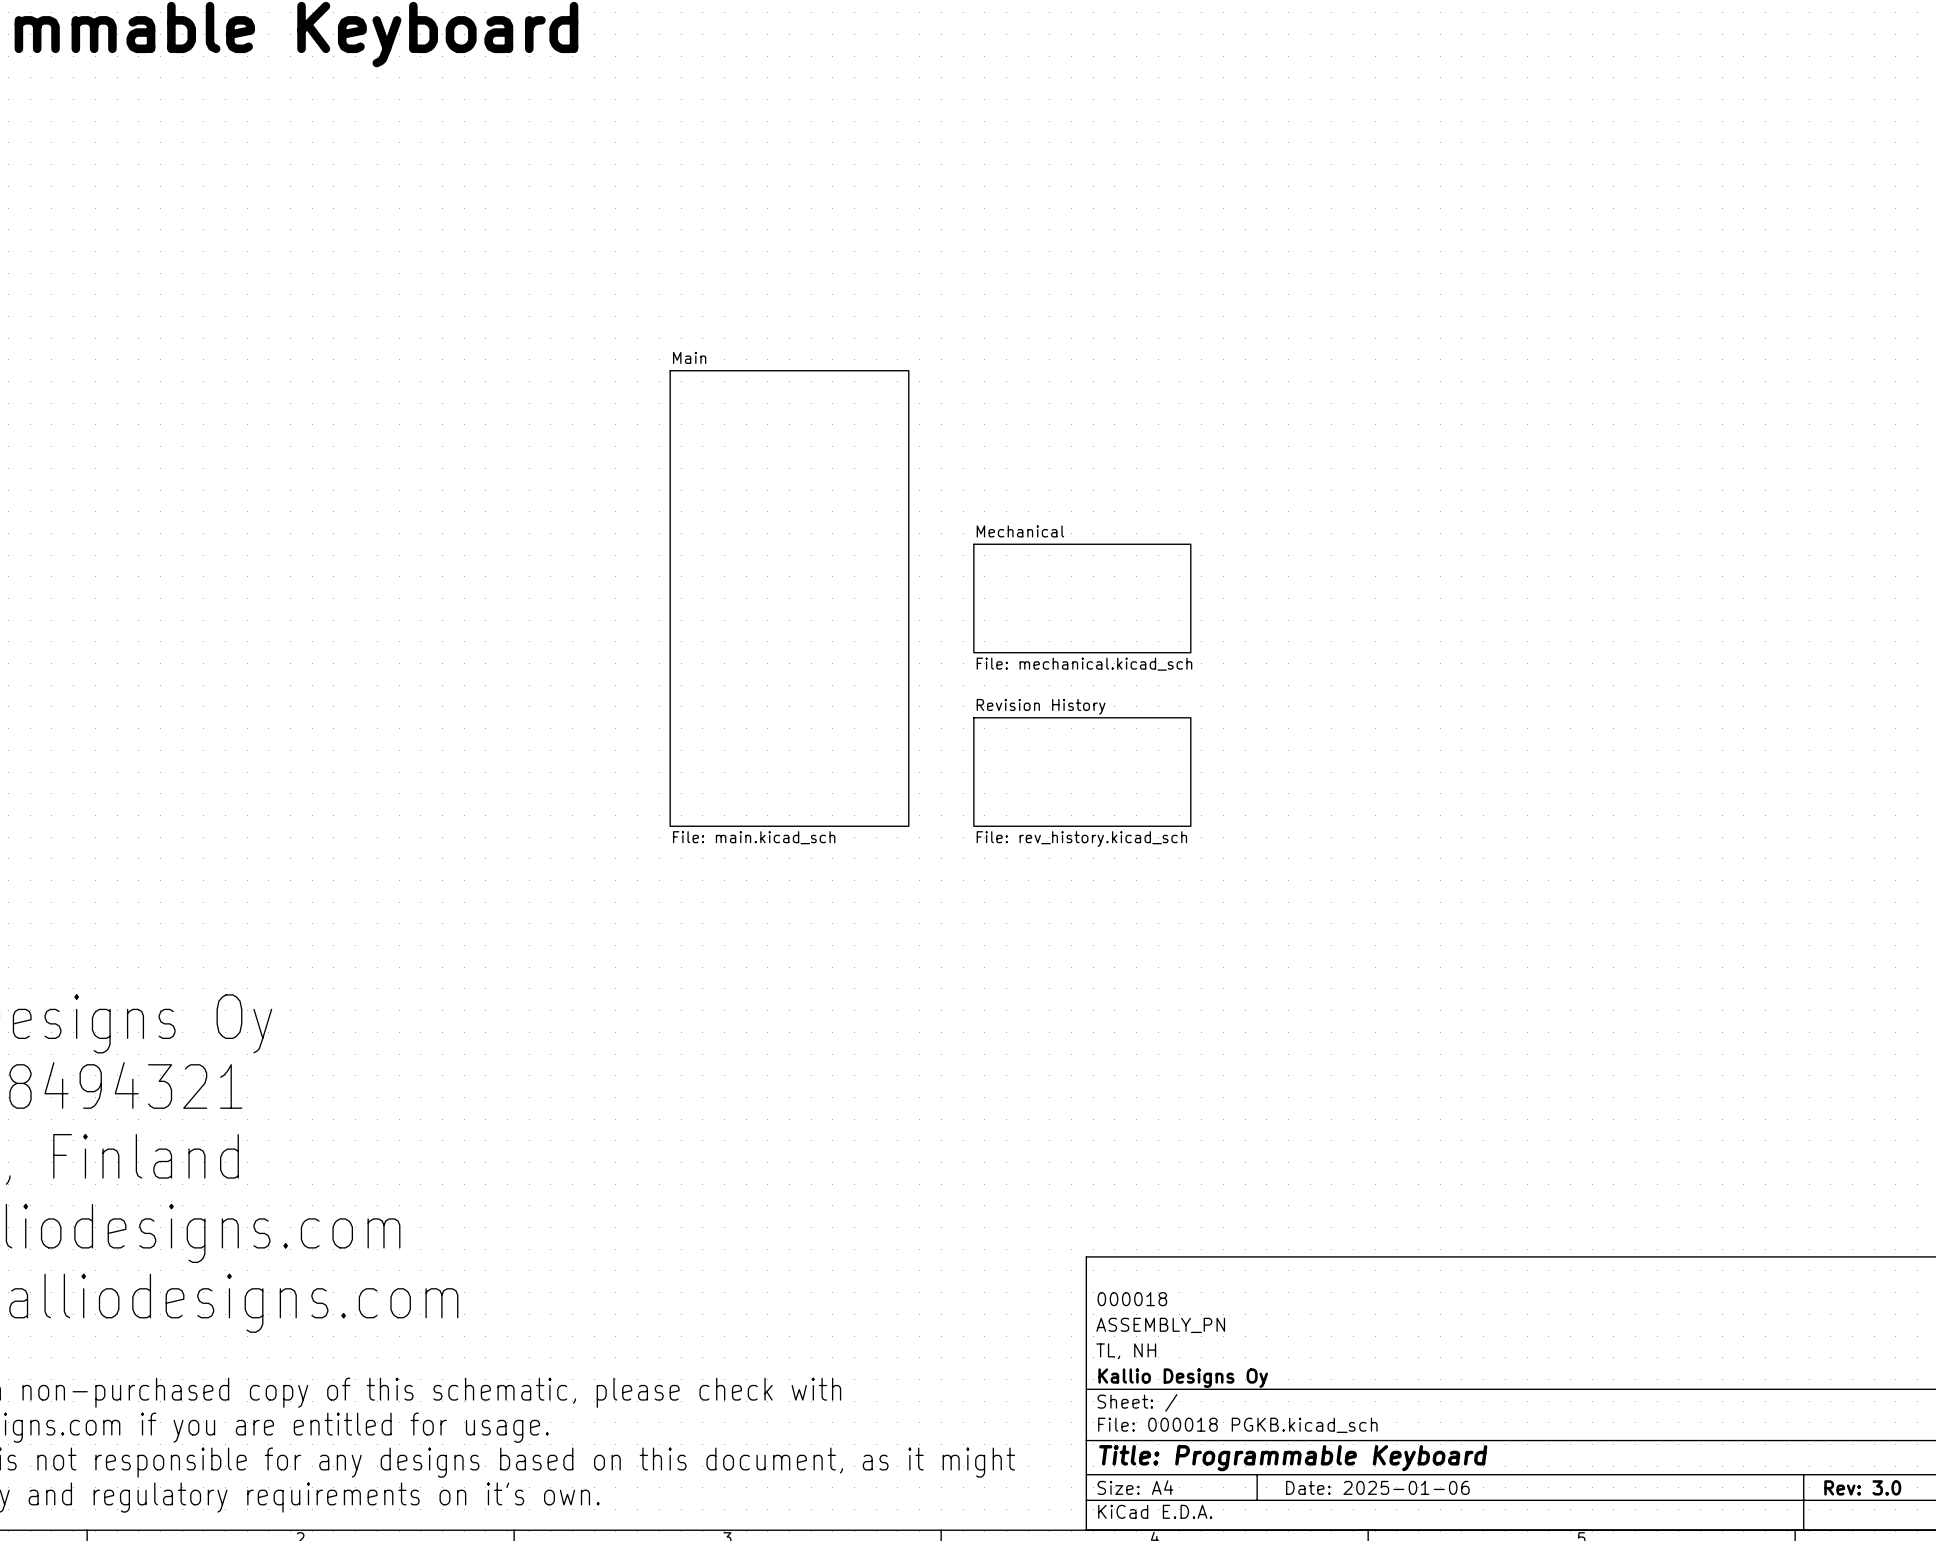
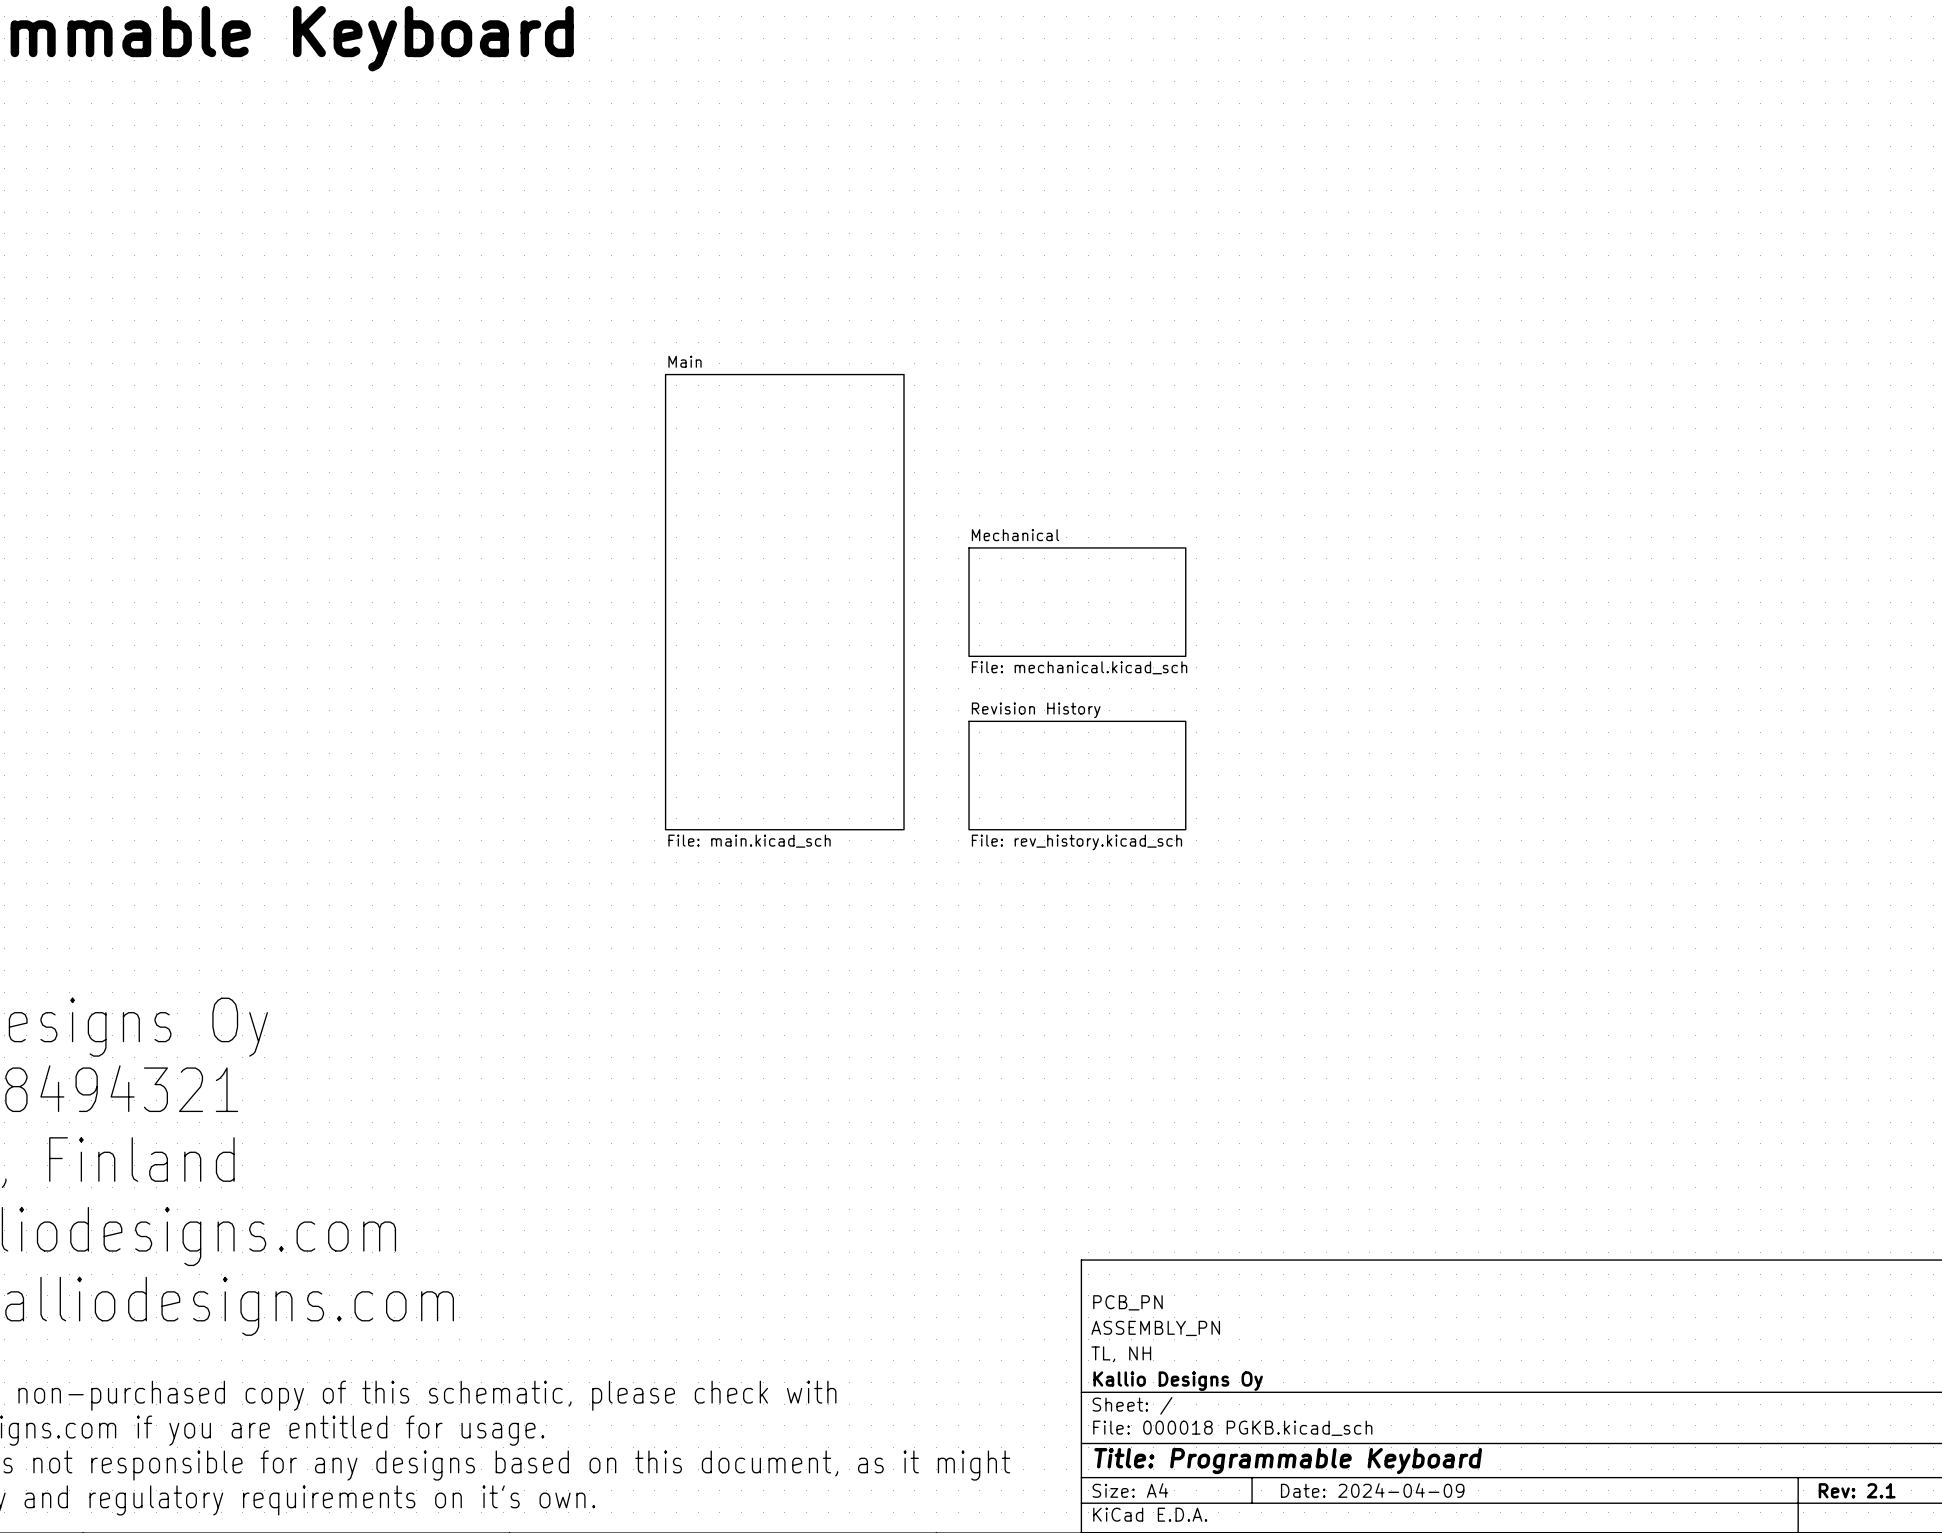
title block: 000018 (1132, 1299) -> PCB_PN (1127, 1302)
title block: Date: 2025-01-06 (1377, 1487) -> Date: 2024-04-09 (1372, 1490)
title block: Rev: 3.0 (1862, 1487) -> Rev: 2.1 (1857, 1490)

